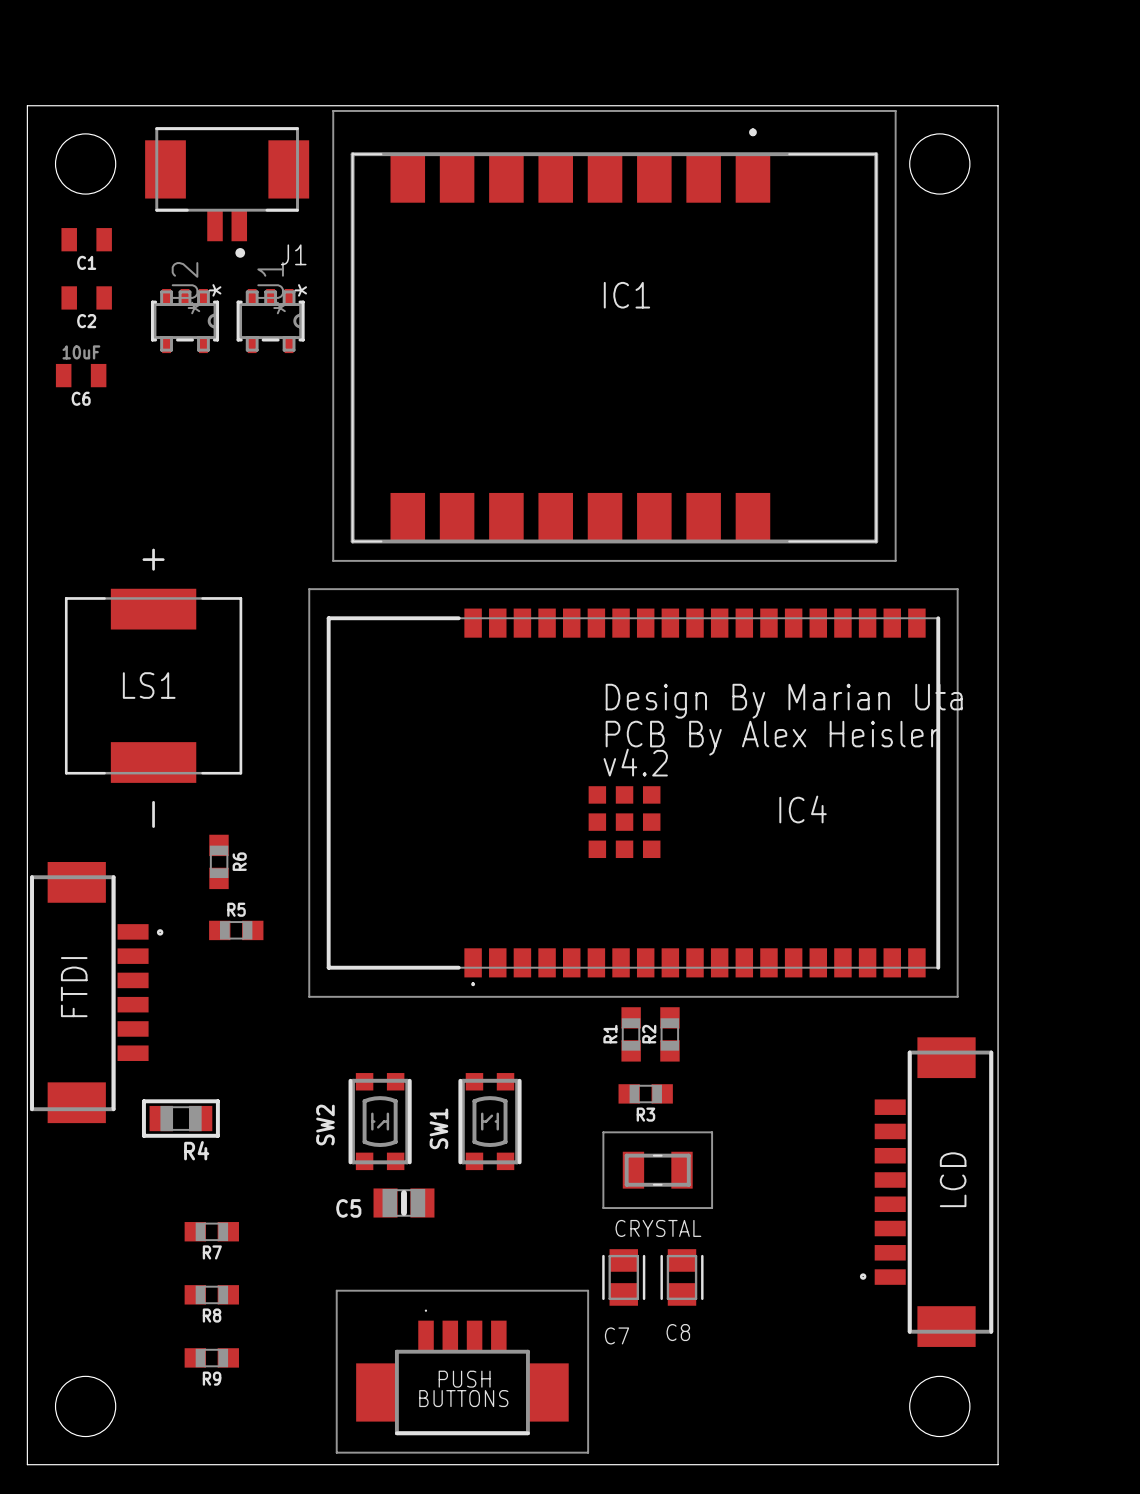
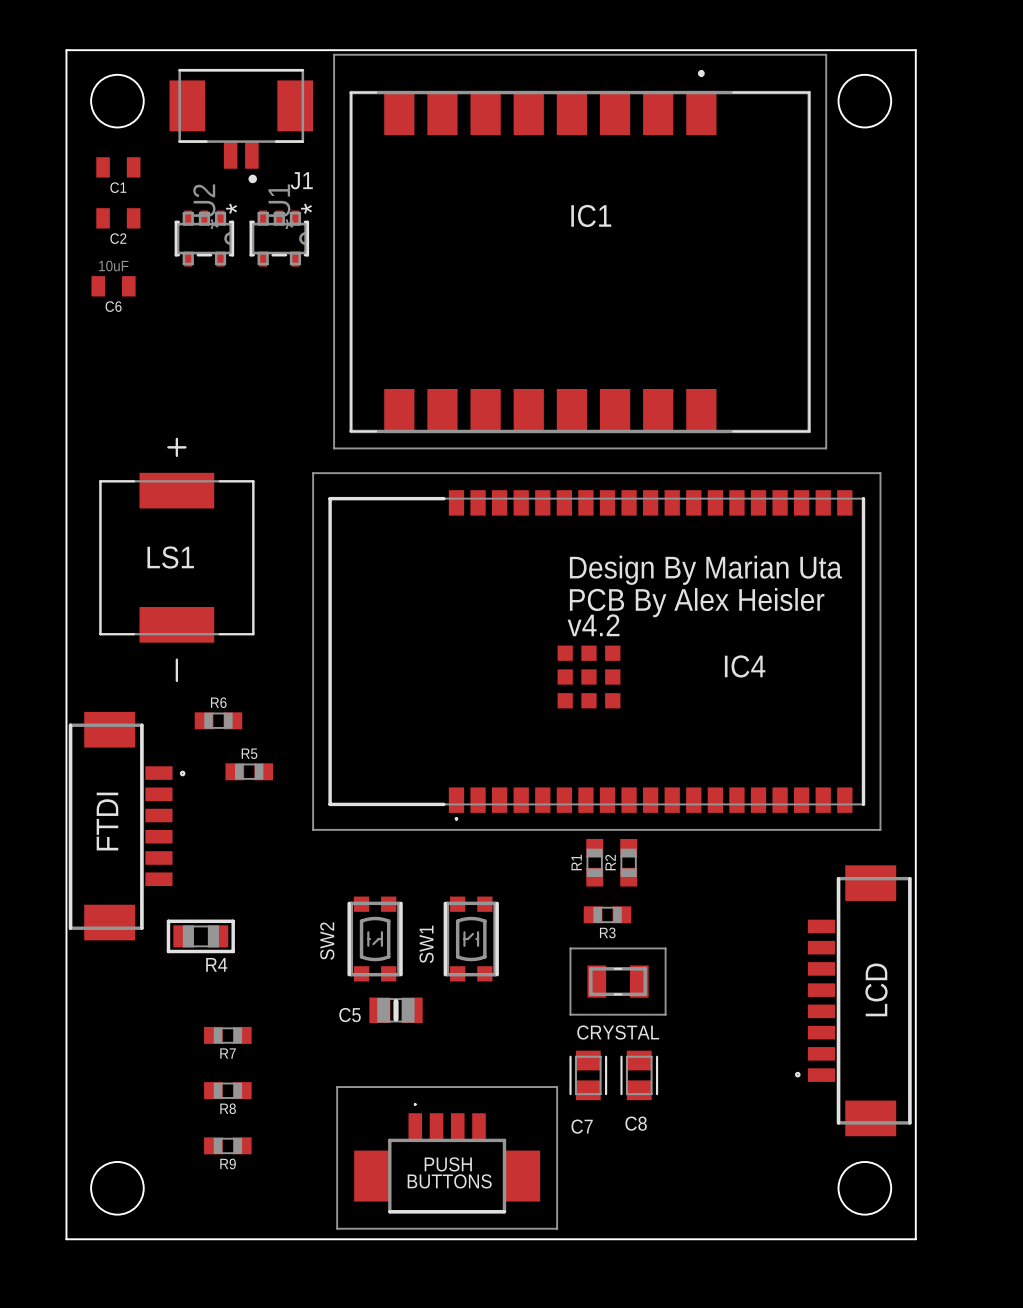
R6 rotation: 0° (218, 861) -> 90° clockwise (218, 720)

